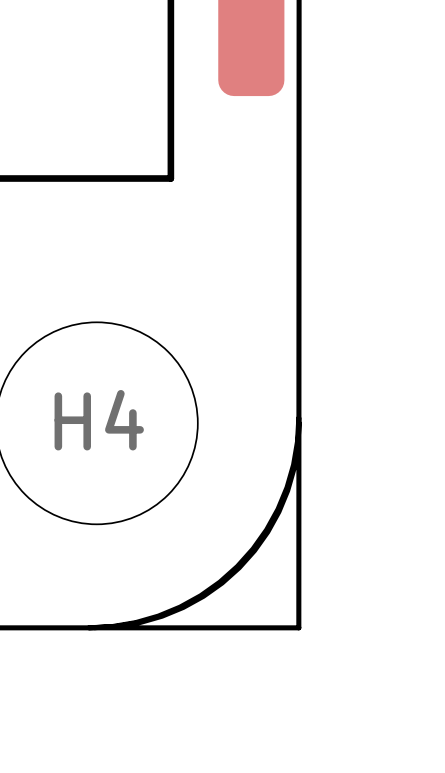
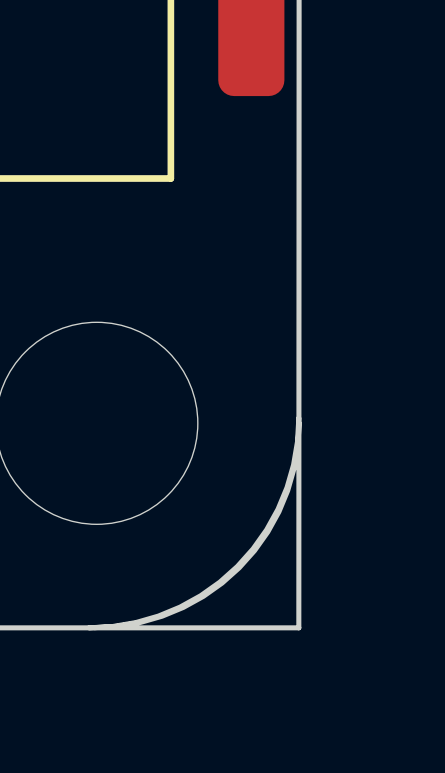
H4 name: H4 (99, 420) -> none

